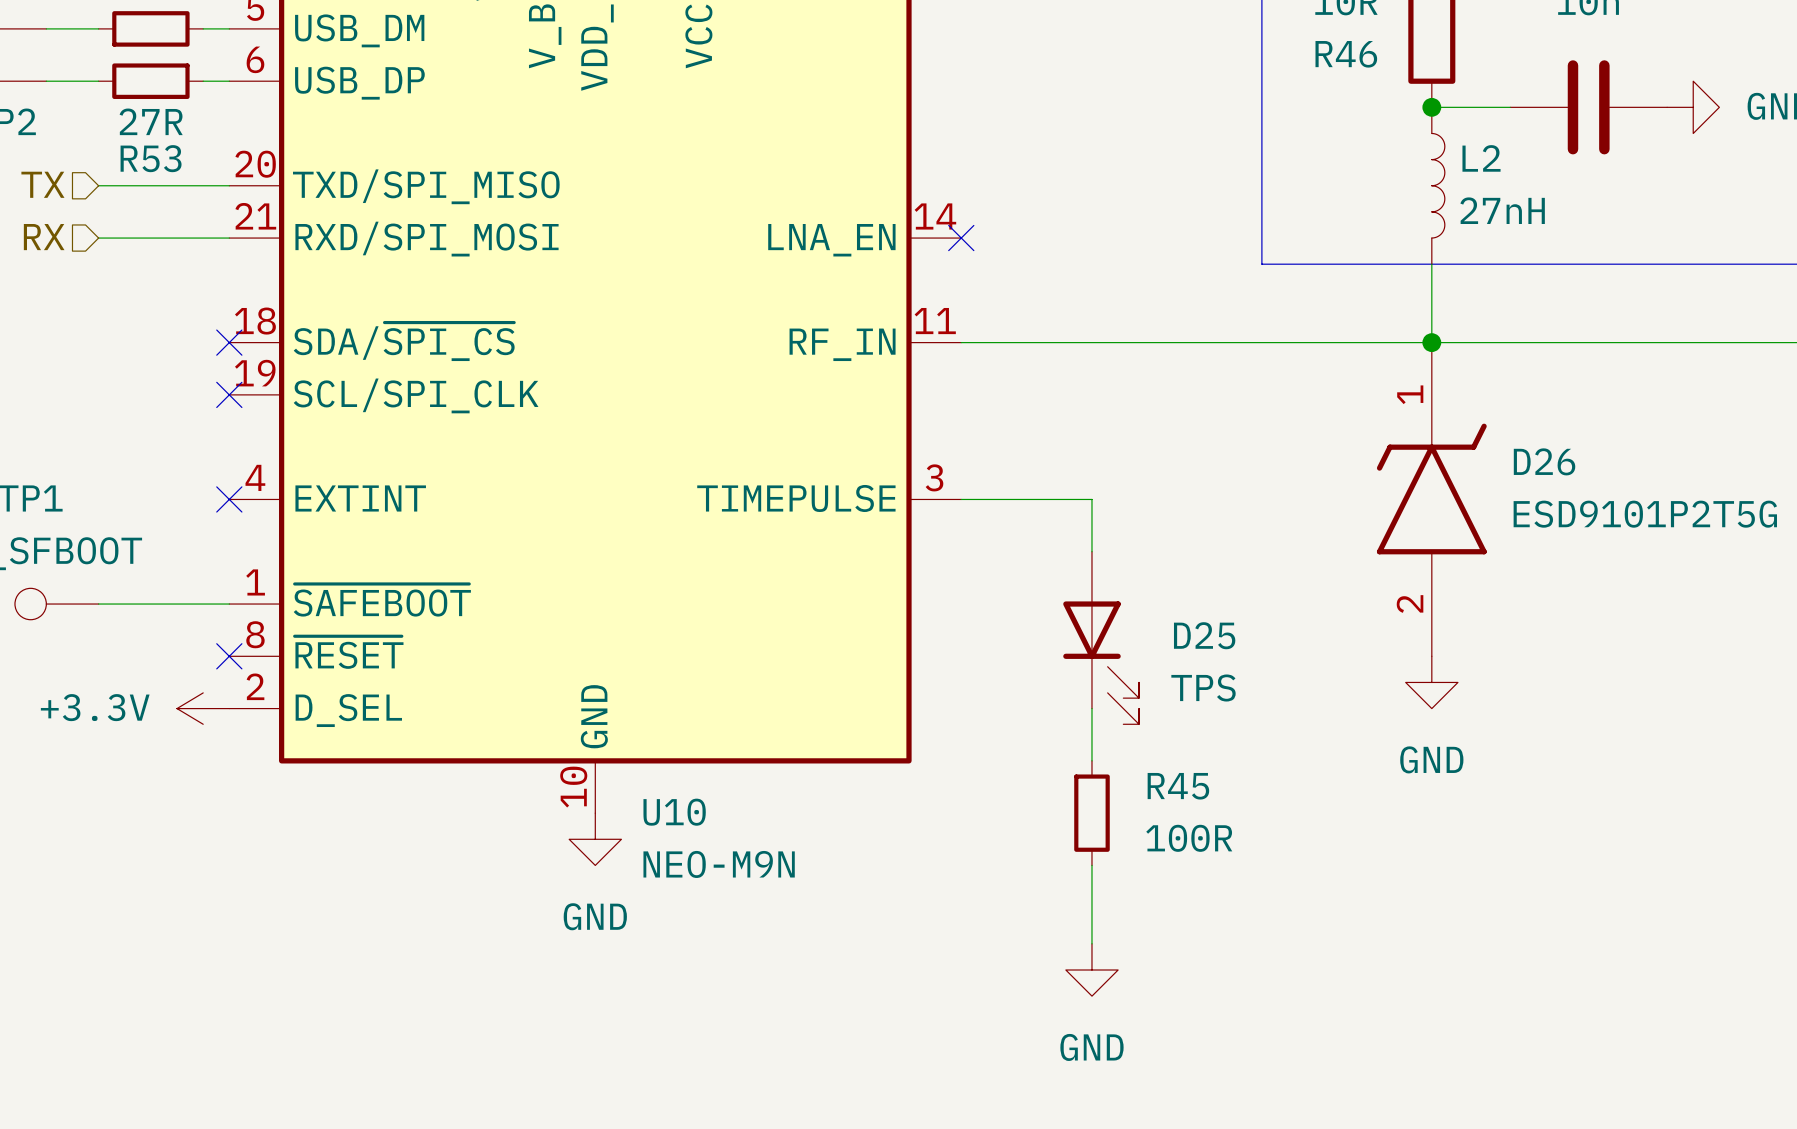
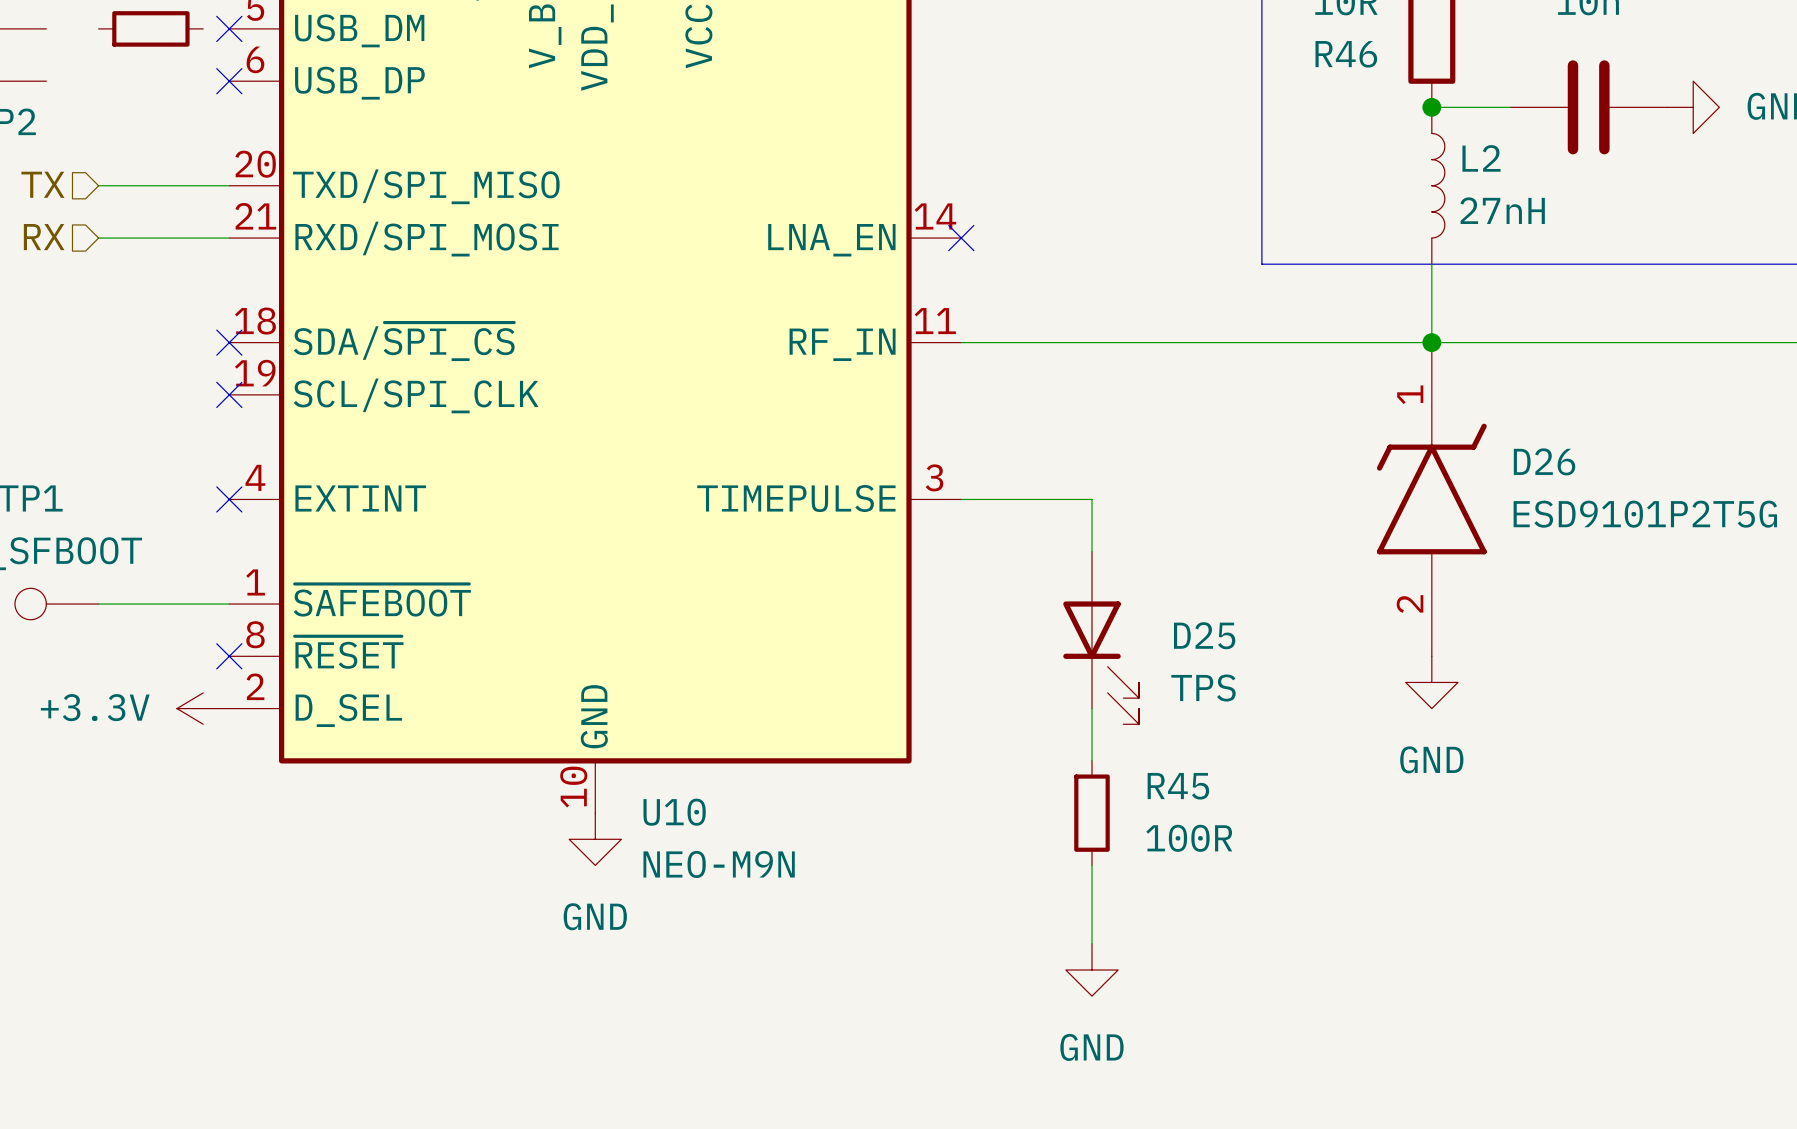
wire: (46, 28) (98, 28) -> none
wire: (203, 28) (229, 28) -> none
no-connect mark: none -> (229, 28)
wire: (46, 81) (98, 81) -> none
R53: 27R (150, 81) -> none
wire: (203, 81) (229, 81) -> none
no-connect mark: none -> (229, 81)

